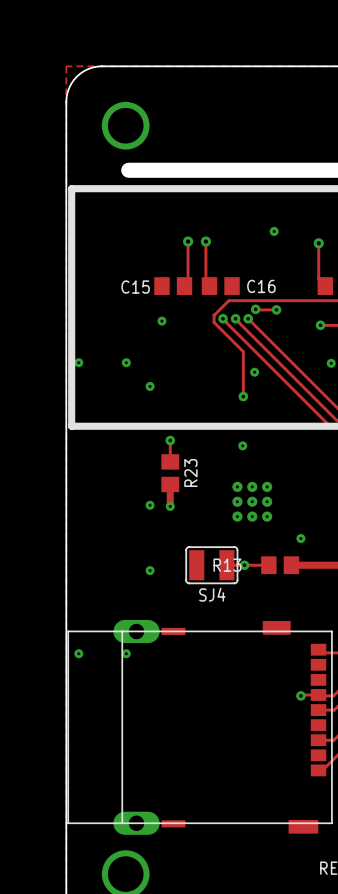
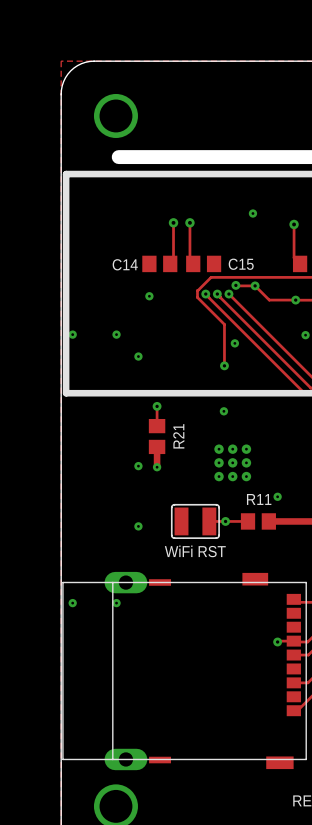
C16 name: C16 (261, 286) -> C15 (241, 264)
C15 name: C15 (135, 287) -> C14 (125, 264)
track: none -> (255, 285) (269, 300) (295, 300)
R23 name: R23 (190, 472) -> R21 (178, 436)
R13 name: R13 (227, 565) -> R11 (259, 499)
SJ4 name: SJ4 (212, 594) -> none
text: none -> WiFi RST (195, 551)

